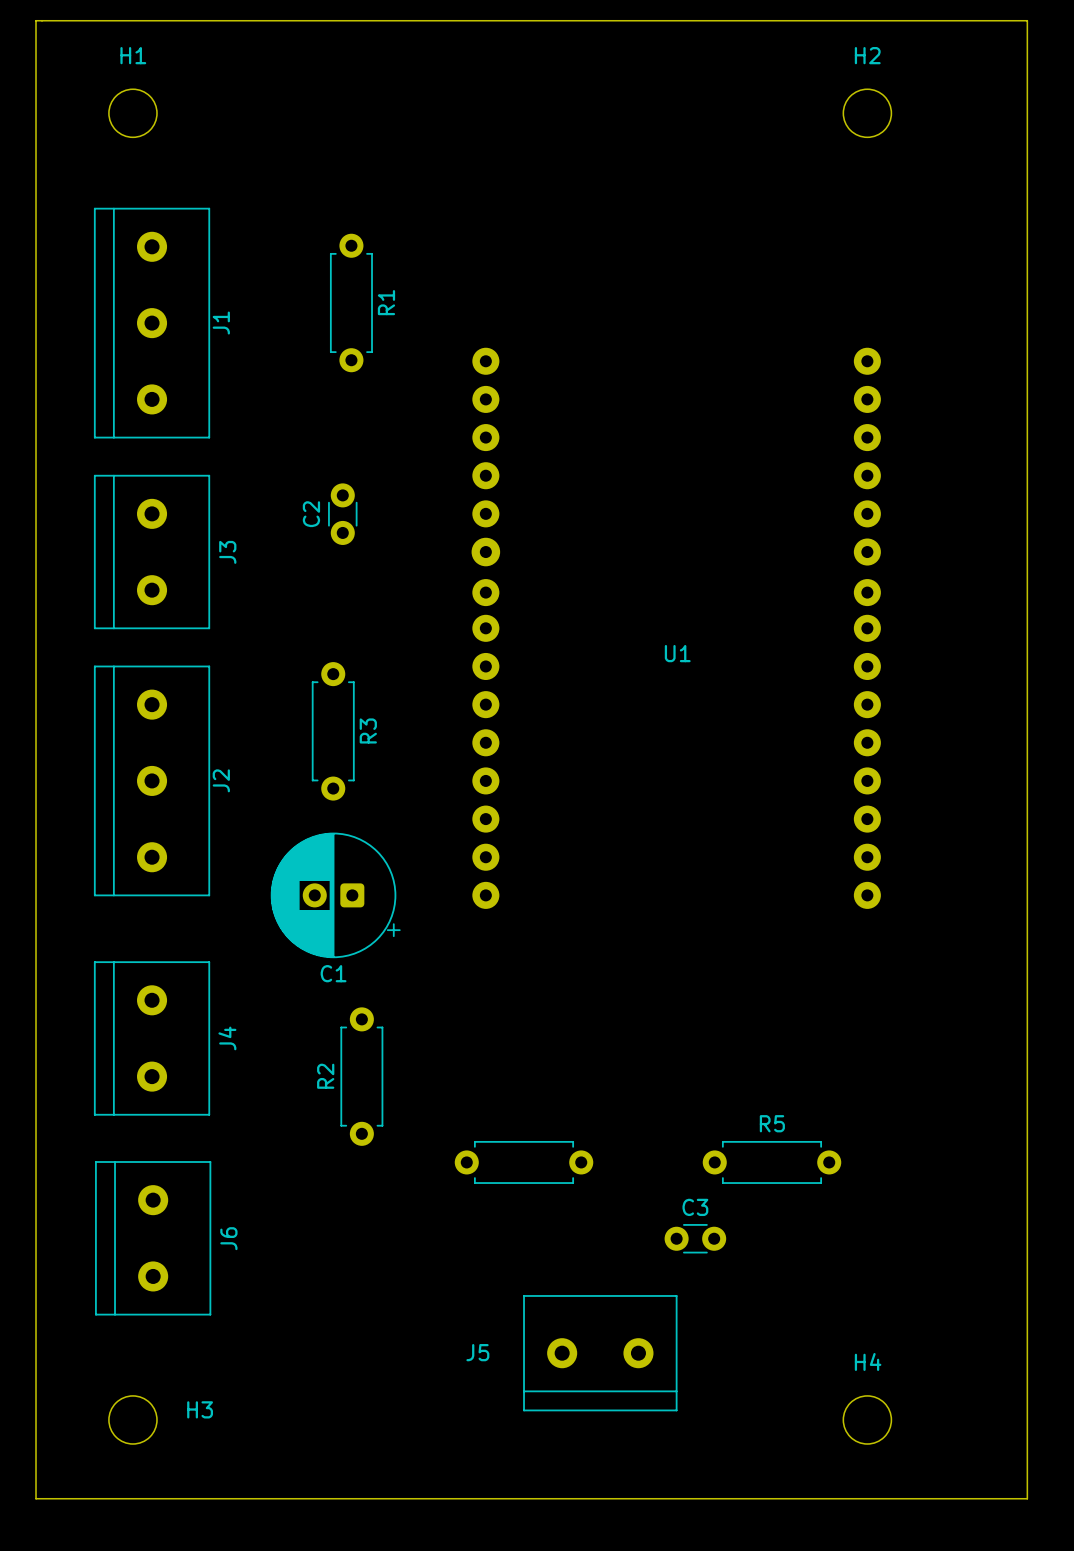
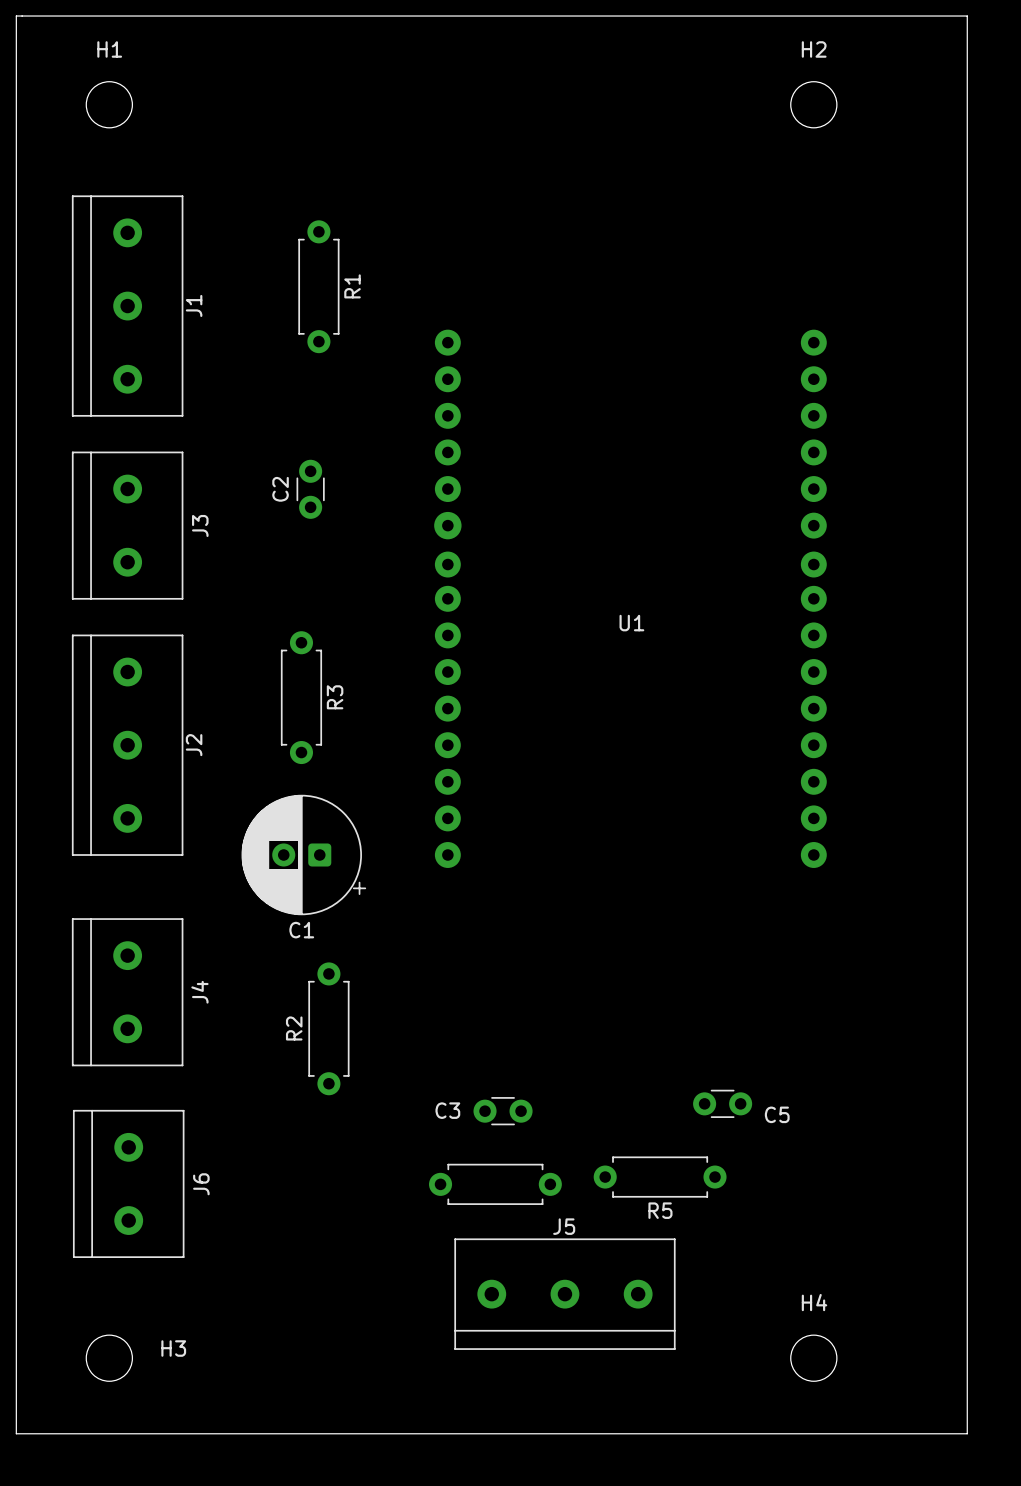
R5 name position: R5 (772, 1123) -> R5 (660, 1210)
C5: none -> (722, 1103)
part position: (524, 1162) -> (495, 1184)
R5 position: (771, 1162) -> (660, 1177)
C3 name position: C3 (695, 1207) -> C3 (447, 1110)
C3 position: (695, 1238) -> (503, 1111)
J5 footprint: [523, 1295, 678, 1412] -> [454, 1238, 676, 1350]
J5 name position: J5 (477, 1352) -> J5 (564, 1226)

